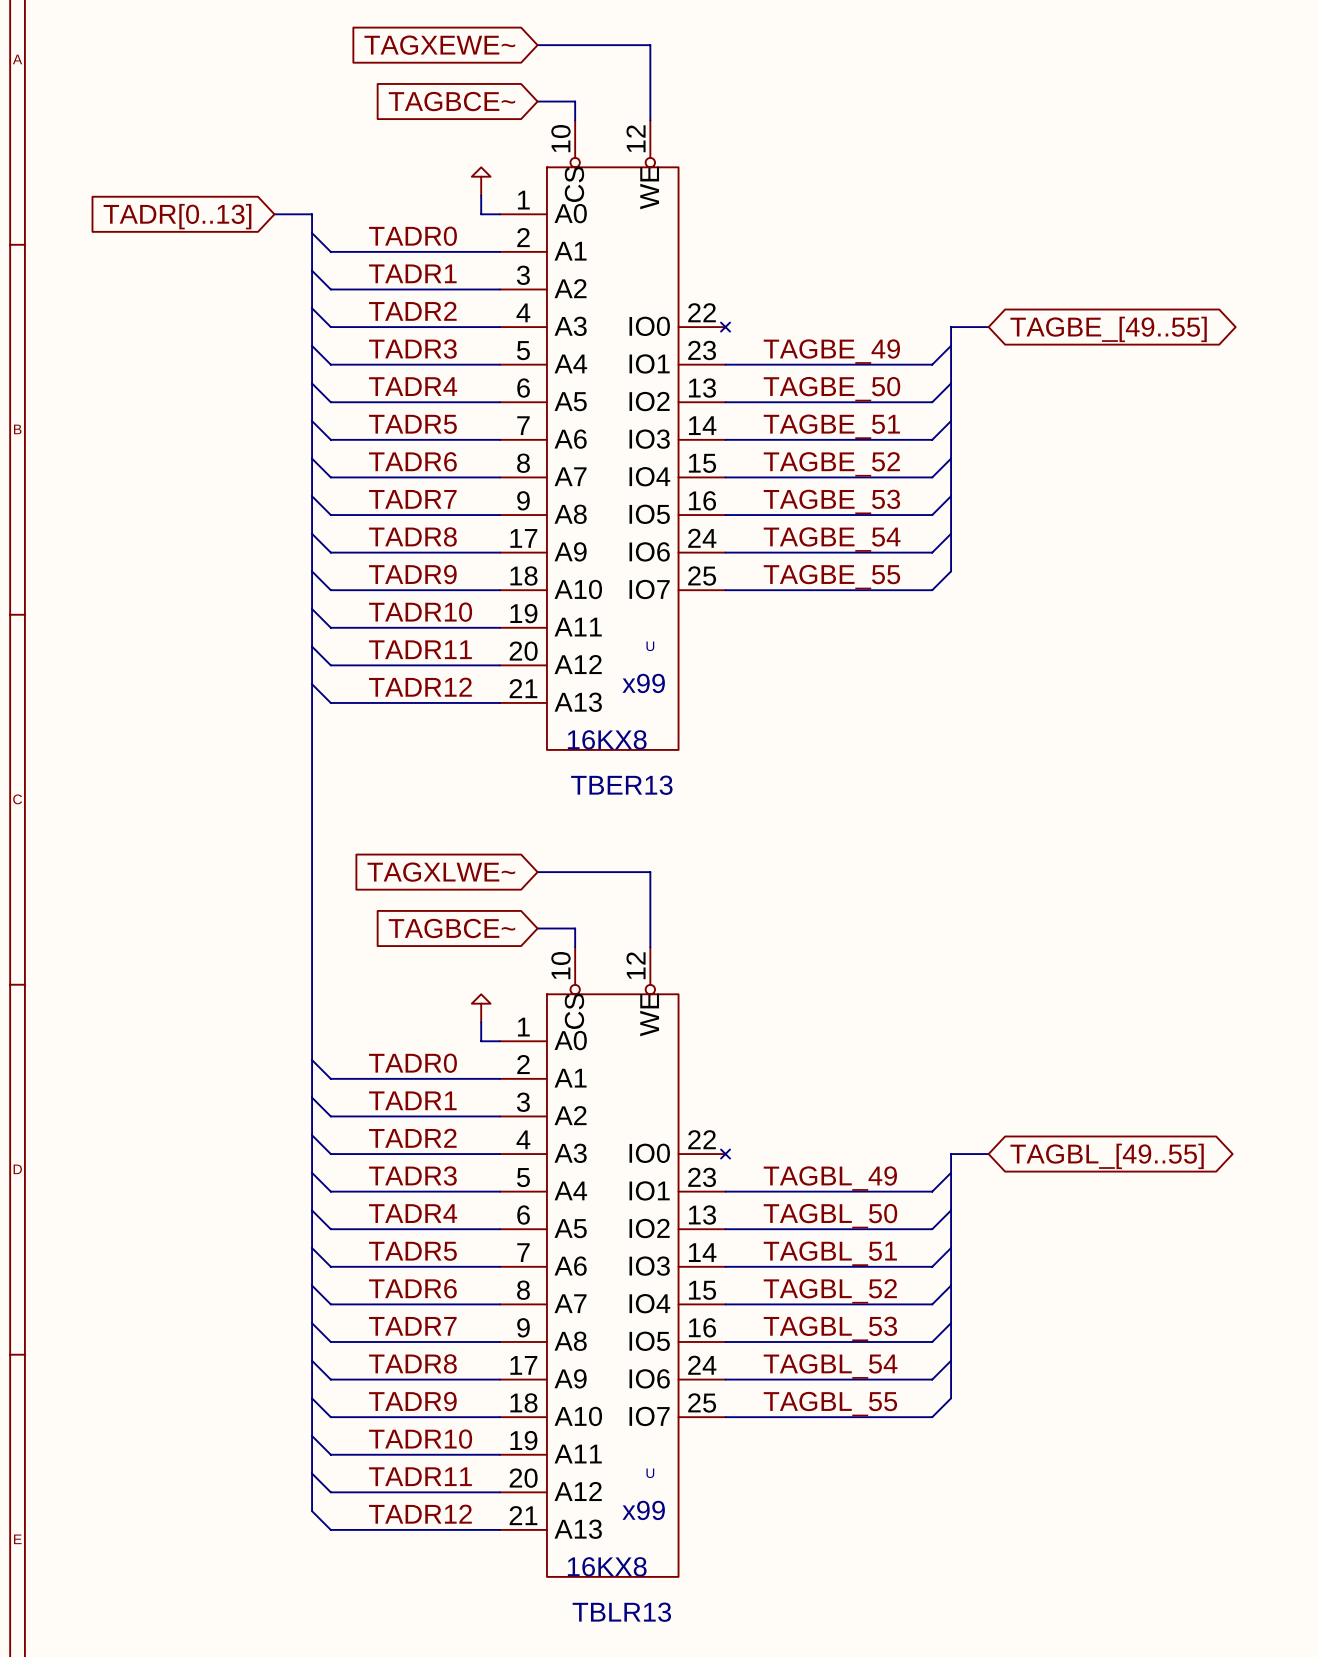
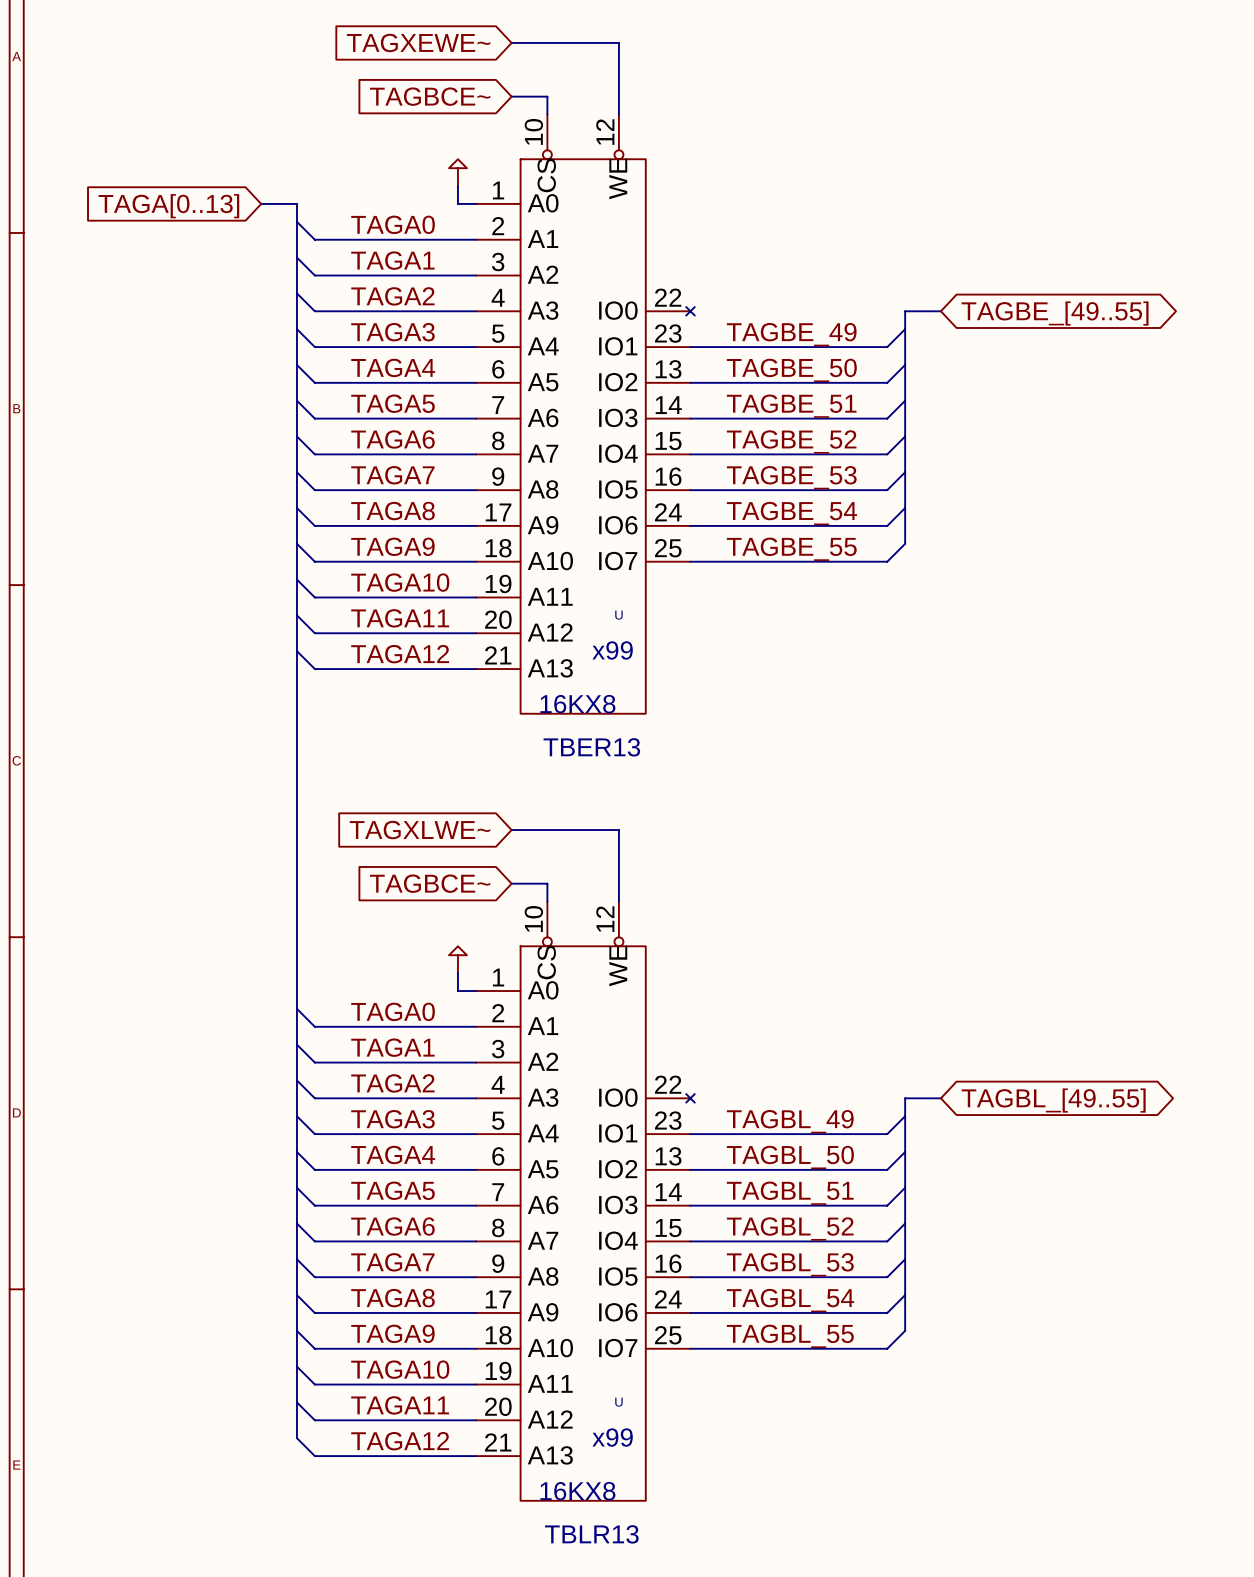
global label: TADR[0..13] (177, 216) -> TAGA[0..13] (168, 206)
label: TADR0 (412, 236) -> TAGA0 (393, 224)
label: TADR1 (412, 273) -> TAGA1 (392, 260)
label: TADR2 (412, 311) -> TAGA2 (392, 296)
label: TADR3 (412, 349) -> TAGA3 (392, 332)
label: TADR4 (413, 386) -> TAGA4 (393, 367)
label: TADR5 (412, 424) -> TAGA5 (393, 403)
label: TADR6 (412, 461) -> TAGA6 (392, 439)
label: TADR7 (412, 499) -> TAGA7 (392, 475)
label: TADR8 (412, 536) -> TAGA8 (392, 511)
label: TADR9 (412, 574) -> TAGA9 (392, 546)
label: TADR10 (420, 612) -> TAGA10 (400, 582)
label: TADR11 (420, 649) -> TAGA11 (400, 618)
label: TADR12 (420, 687) -> TAGA12 (400, 654)
label: TADR0 (412, 1063) -> TAGA0 (393, 1011)
label: TADR1 (412, 1100) -> TAGA1 (392, 1047)
label: TADR2 (412, 1138) -> TAGA2 (392, 1083)
label: TADR3 (412, 1175) -> TAGA3 (392, 1119)
label: TADR4 (413, 1213) -> TAGA4 (393, 1154)
label: TADR5 (412, 1251) -> TAGA5 (393, 1190)
label: TADR6 (412, 1288) -> TAGA6 (392, 1226)
label: TADR7 (412, 1326) -> TAGA7 (392, 1262)
label: TADR8 (412, 1363) -> TAGA8 (392, 1298)
label: TADR9 (412, 1401) -> TAGA9 (392, 1333)
label: TADR10 (420, 1439) -> TAGA10 (400, 1369)
label: TADR11 (420, 1476) -> TAGA11 (400, 1405)
label: TADR12 (420, 1514) -> TAGA12 (400, 1441)

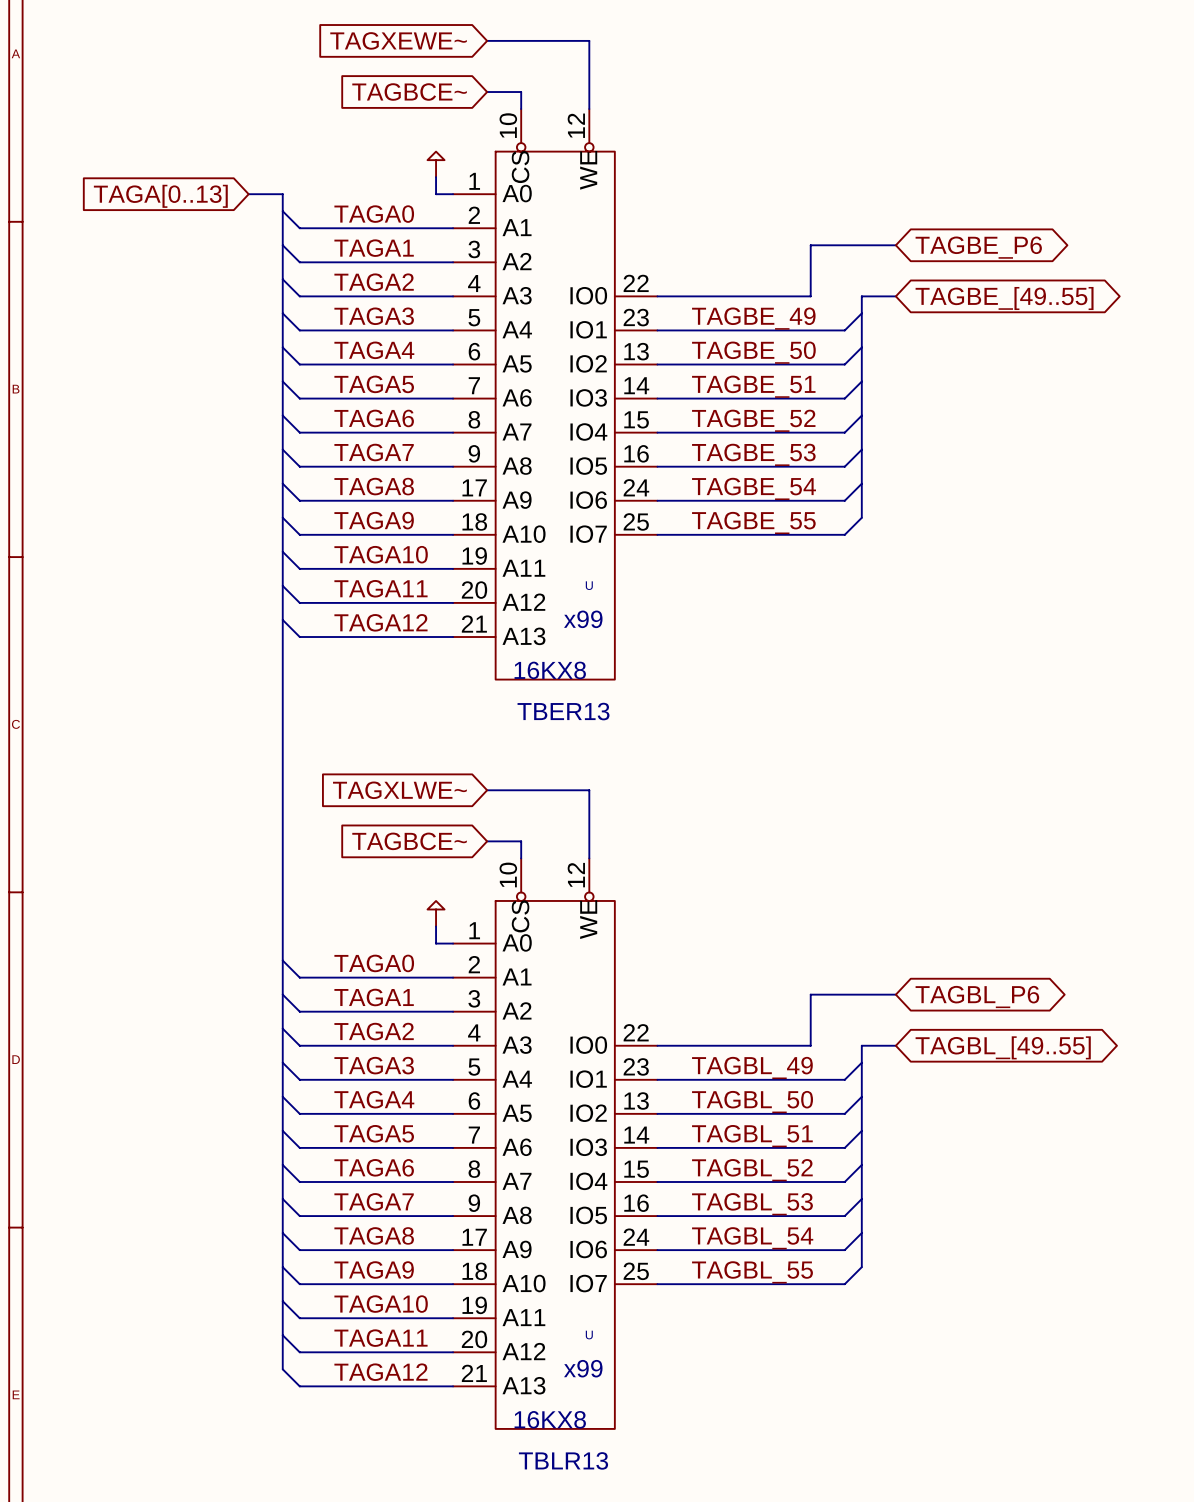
wire: none -> (895, 245) (810, 245) (810, 296) (657, 296)
global label: none -> TAGBE_P6 (978, 247)
no-connect mark: (690, 311) -> none
wire: none -> (895, 994) (810, 994) (810, 1045) (657, 1045)
global label: none -> TAGBL_P6 (977, 996)
no-connect mark: (690, 1098) -> none

